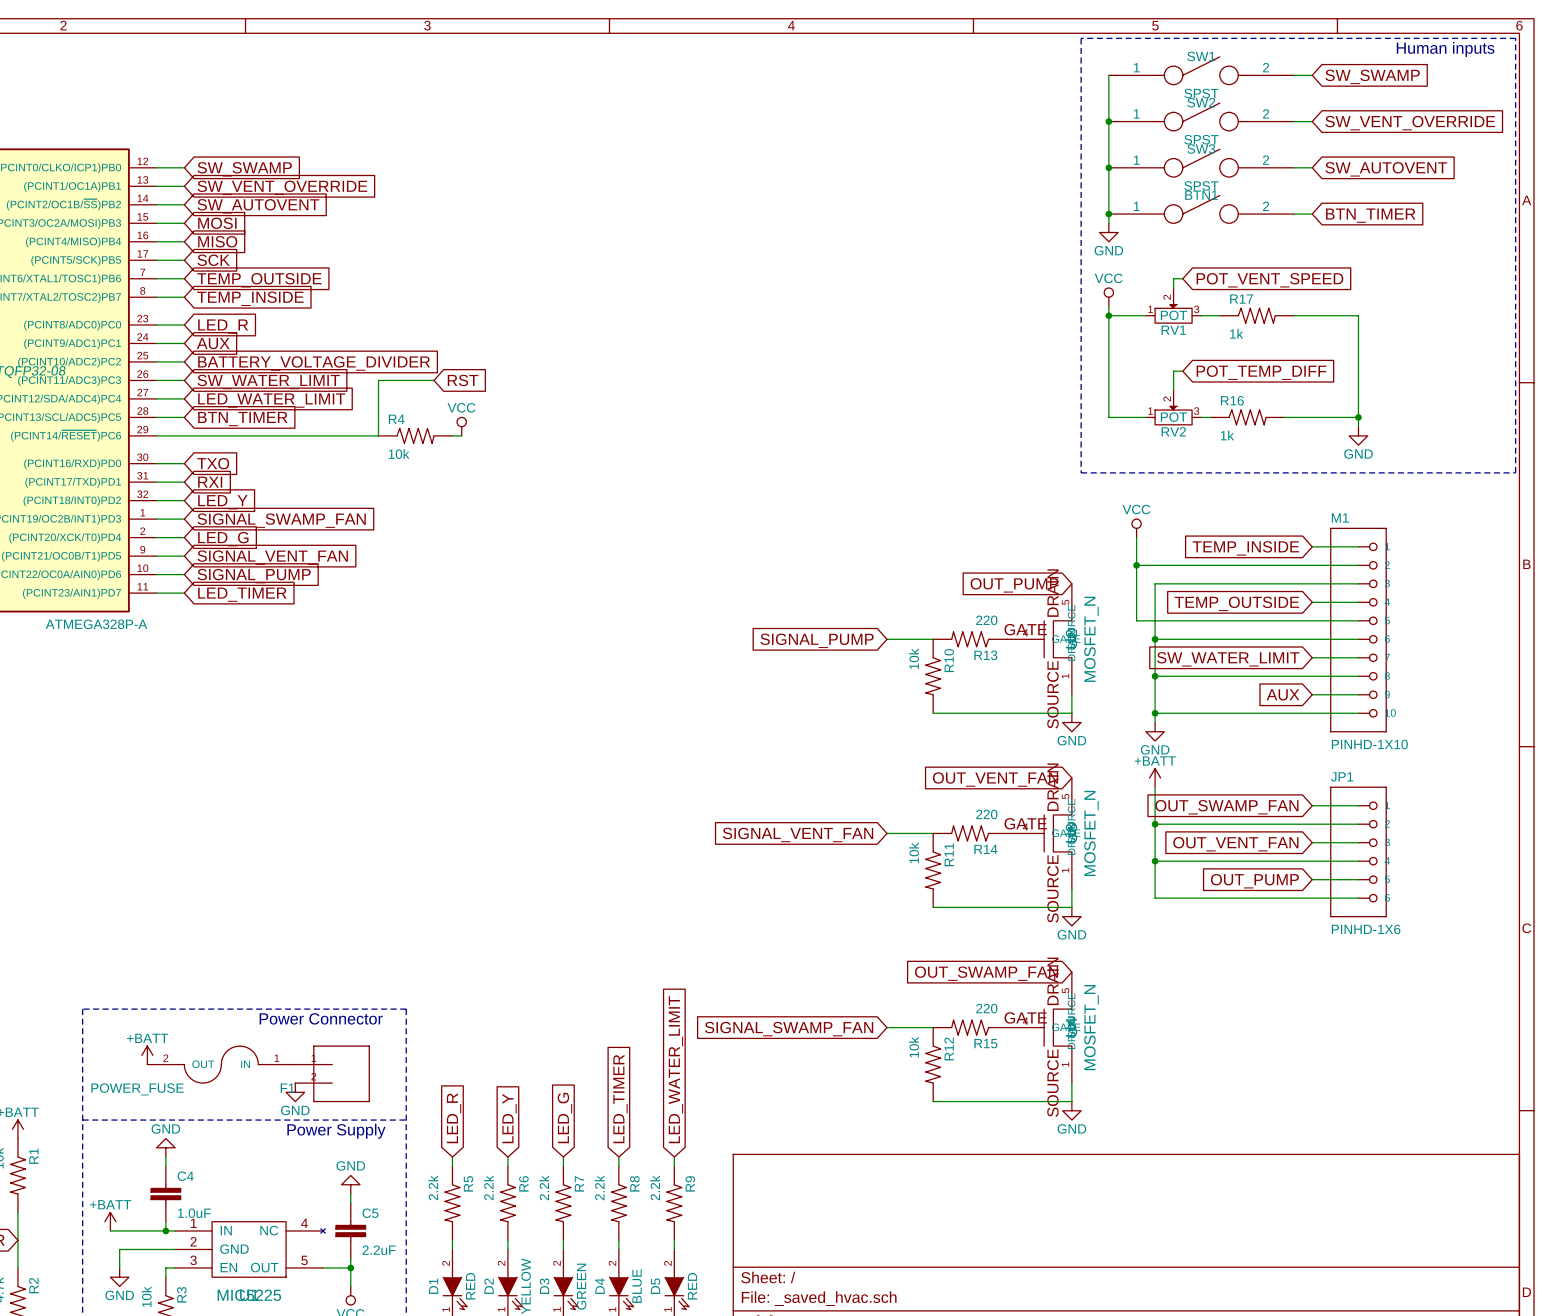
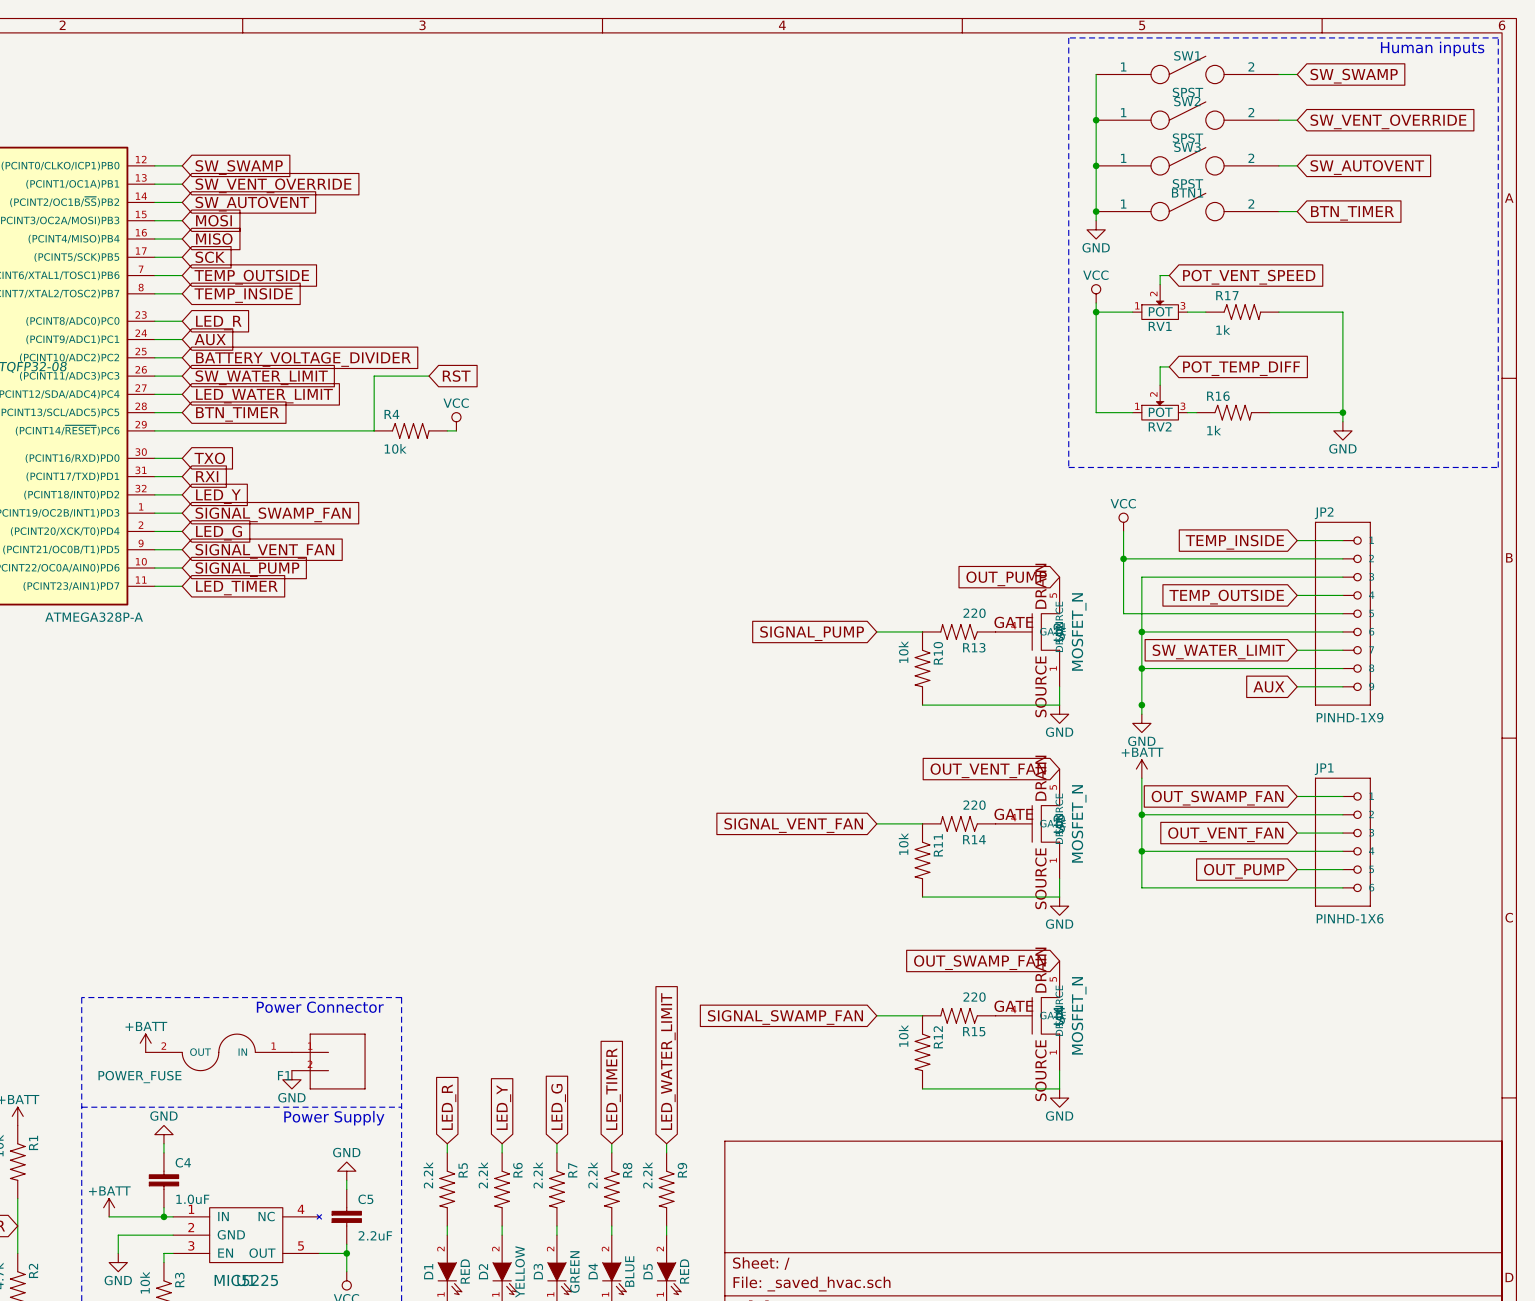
JP2: none -> PINHD-1X9 (1342, 613)
M1: PINHD-1X10 (1358, 630) -> none
wire: (1155, 713) (1358, 713) -> none

